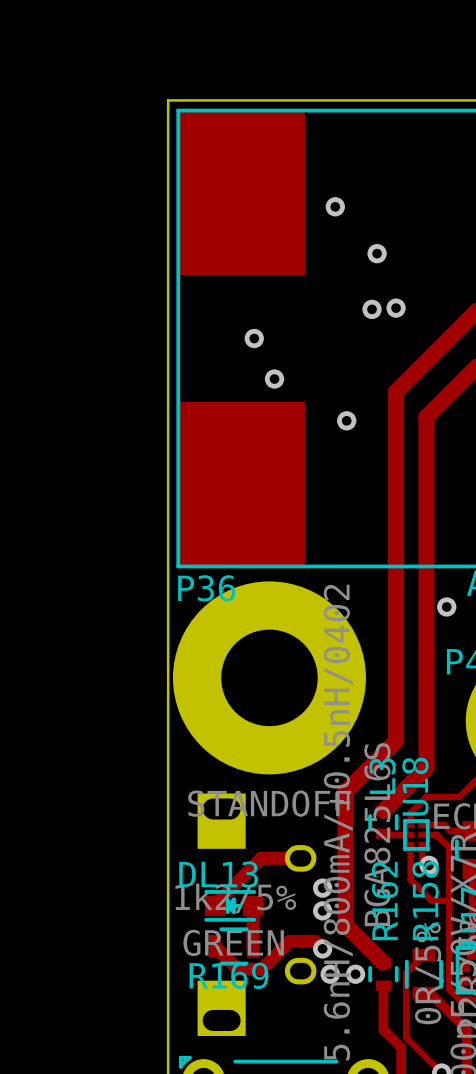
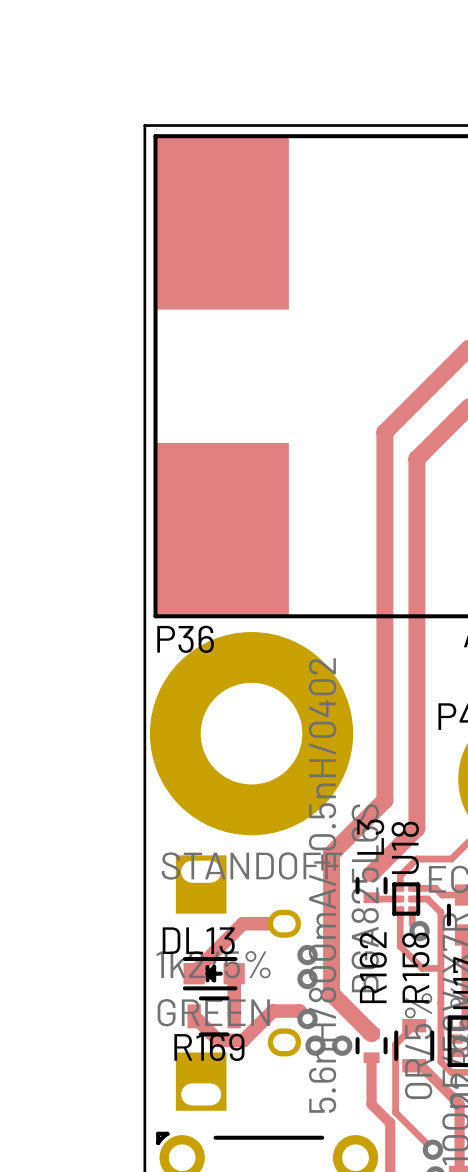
via: (335, 206) -> none
via: (377, 253) -> none
via: (396, 308) -> none
via: (372, 309) -> none
via: (254, 338) -> none
via: (274, 379) -> none
via: (346, 420) -> none
via: (446, 606) -> none

